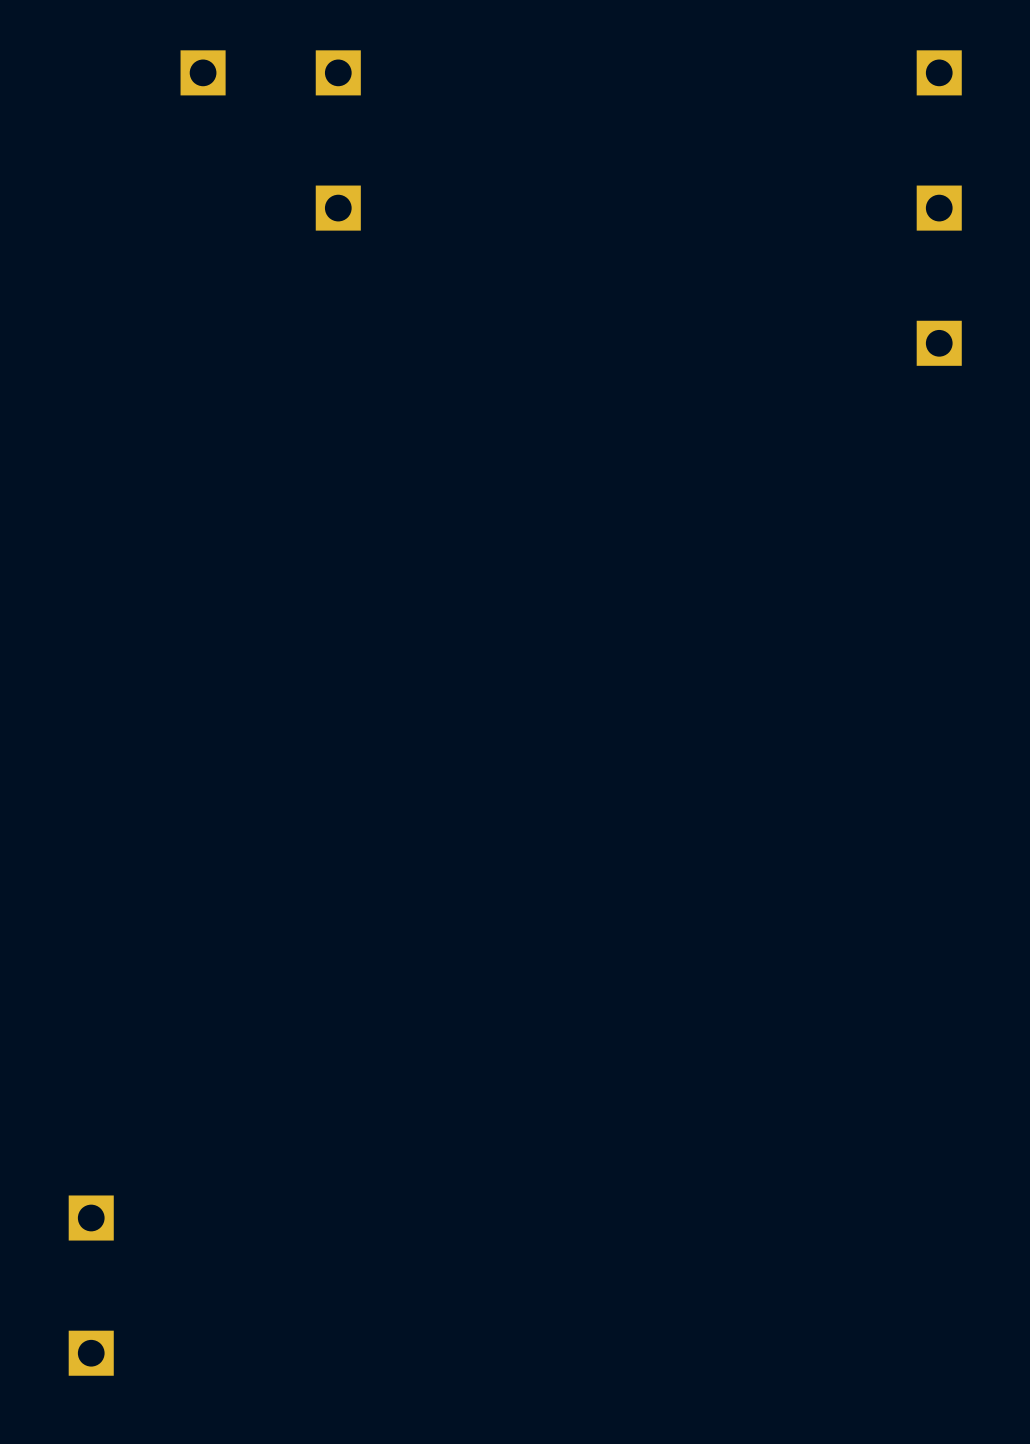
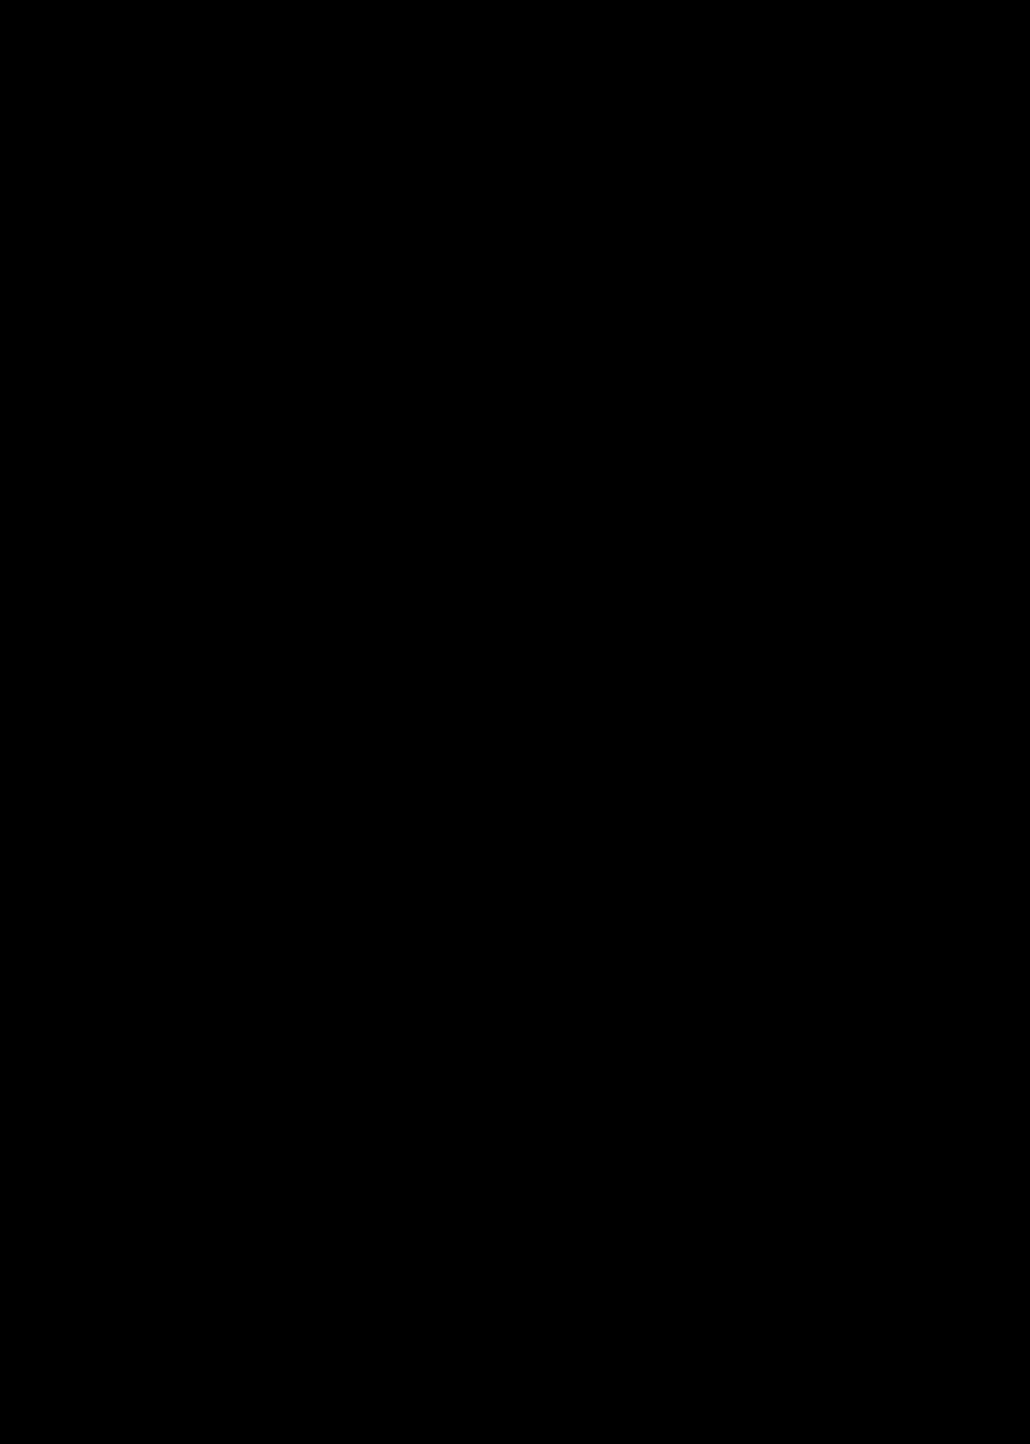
part: (203, 72) -> none
part: (338, 72) -> none
part: (939, 72) -> none
part: (338, 208) -> none
part: (939, 208) -> none
part: (939, 343) -> none
part: (91, 1218) -> none
part: (91, 1353) -> none

